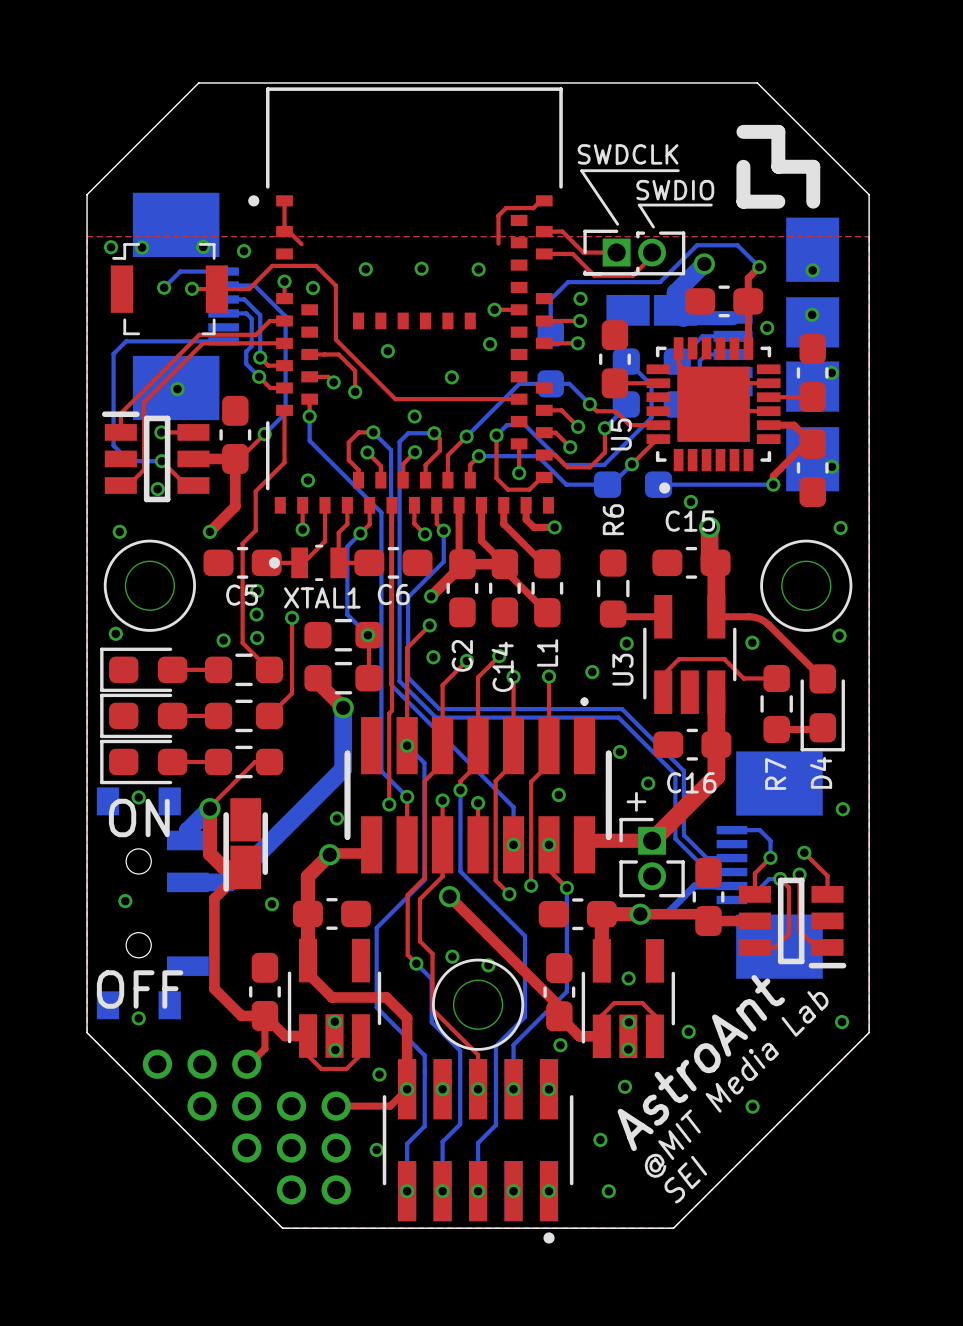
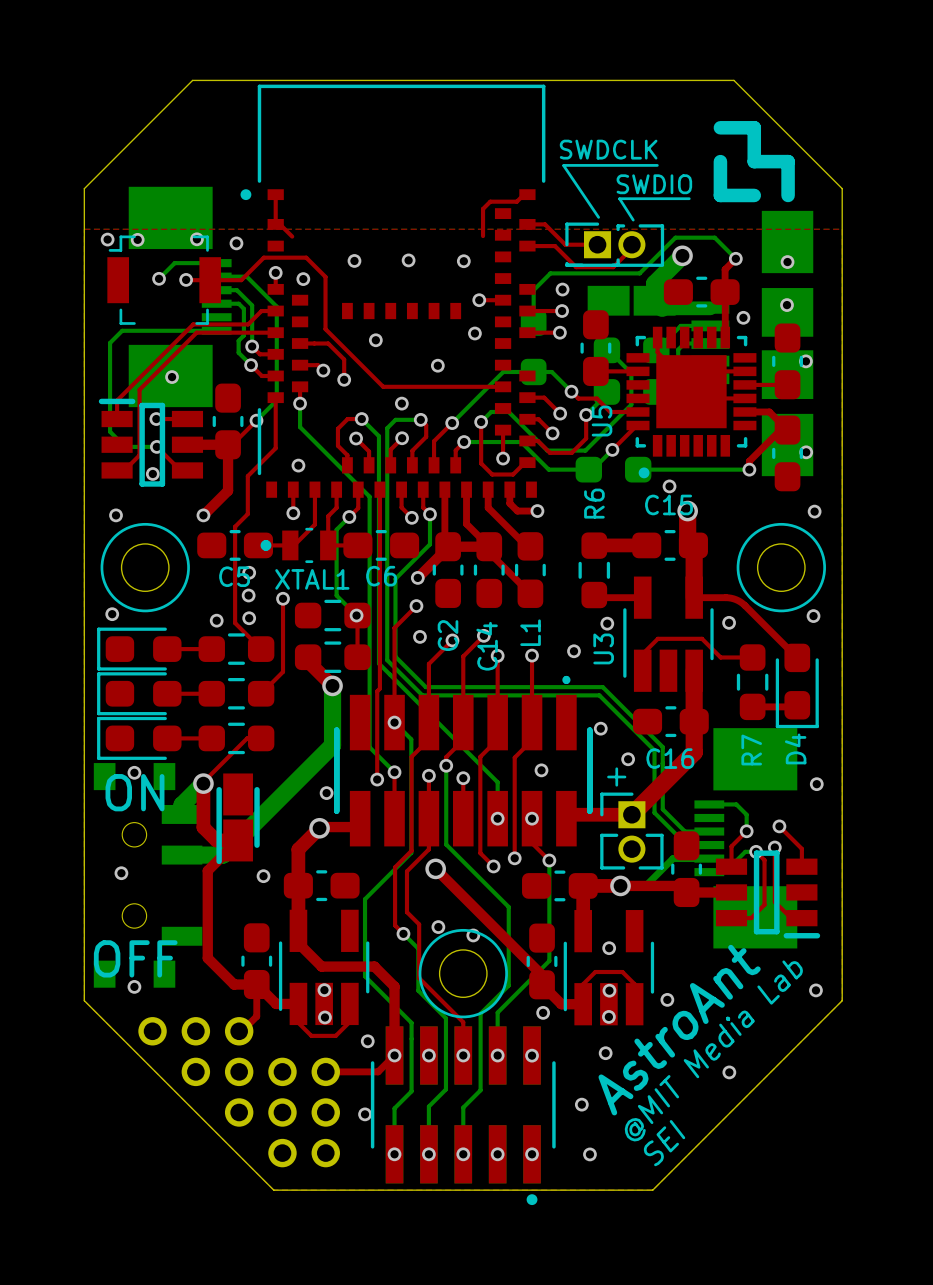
top track: none -> (594, 545) (641, 545)

